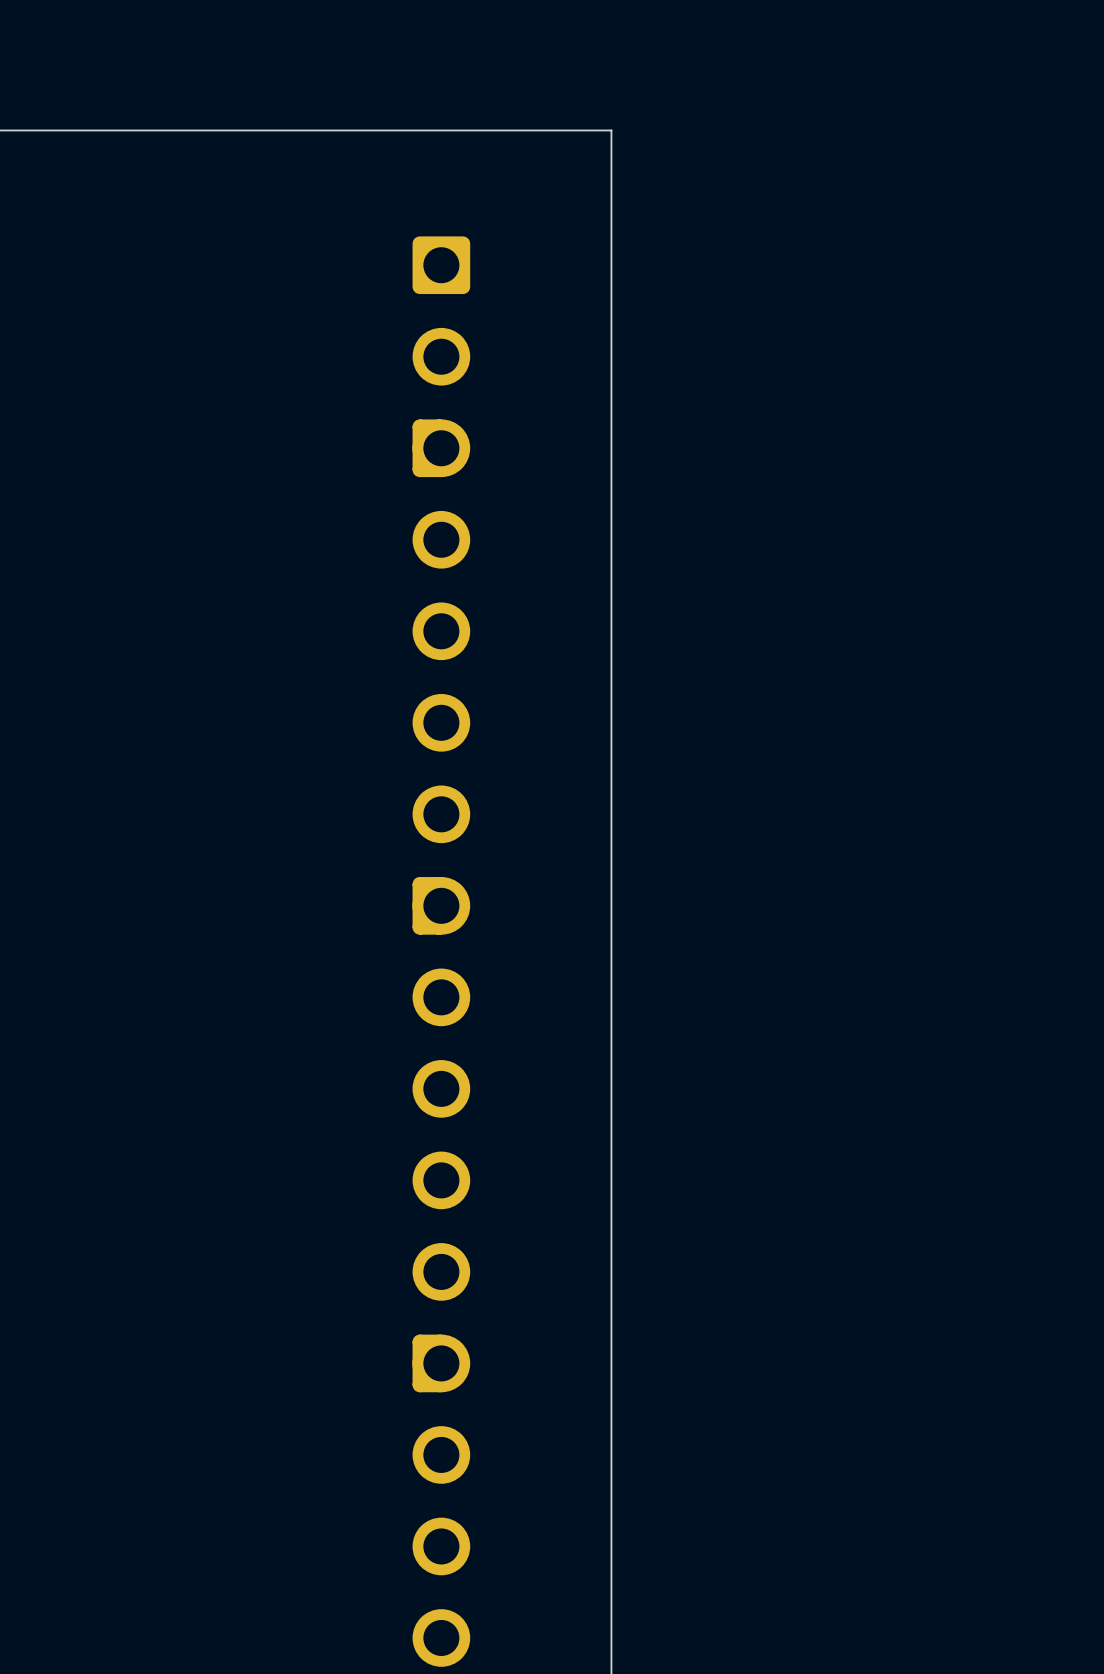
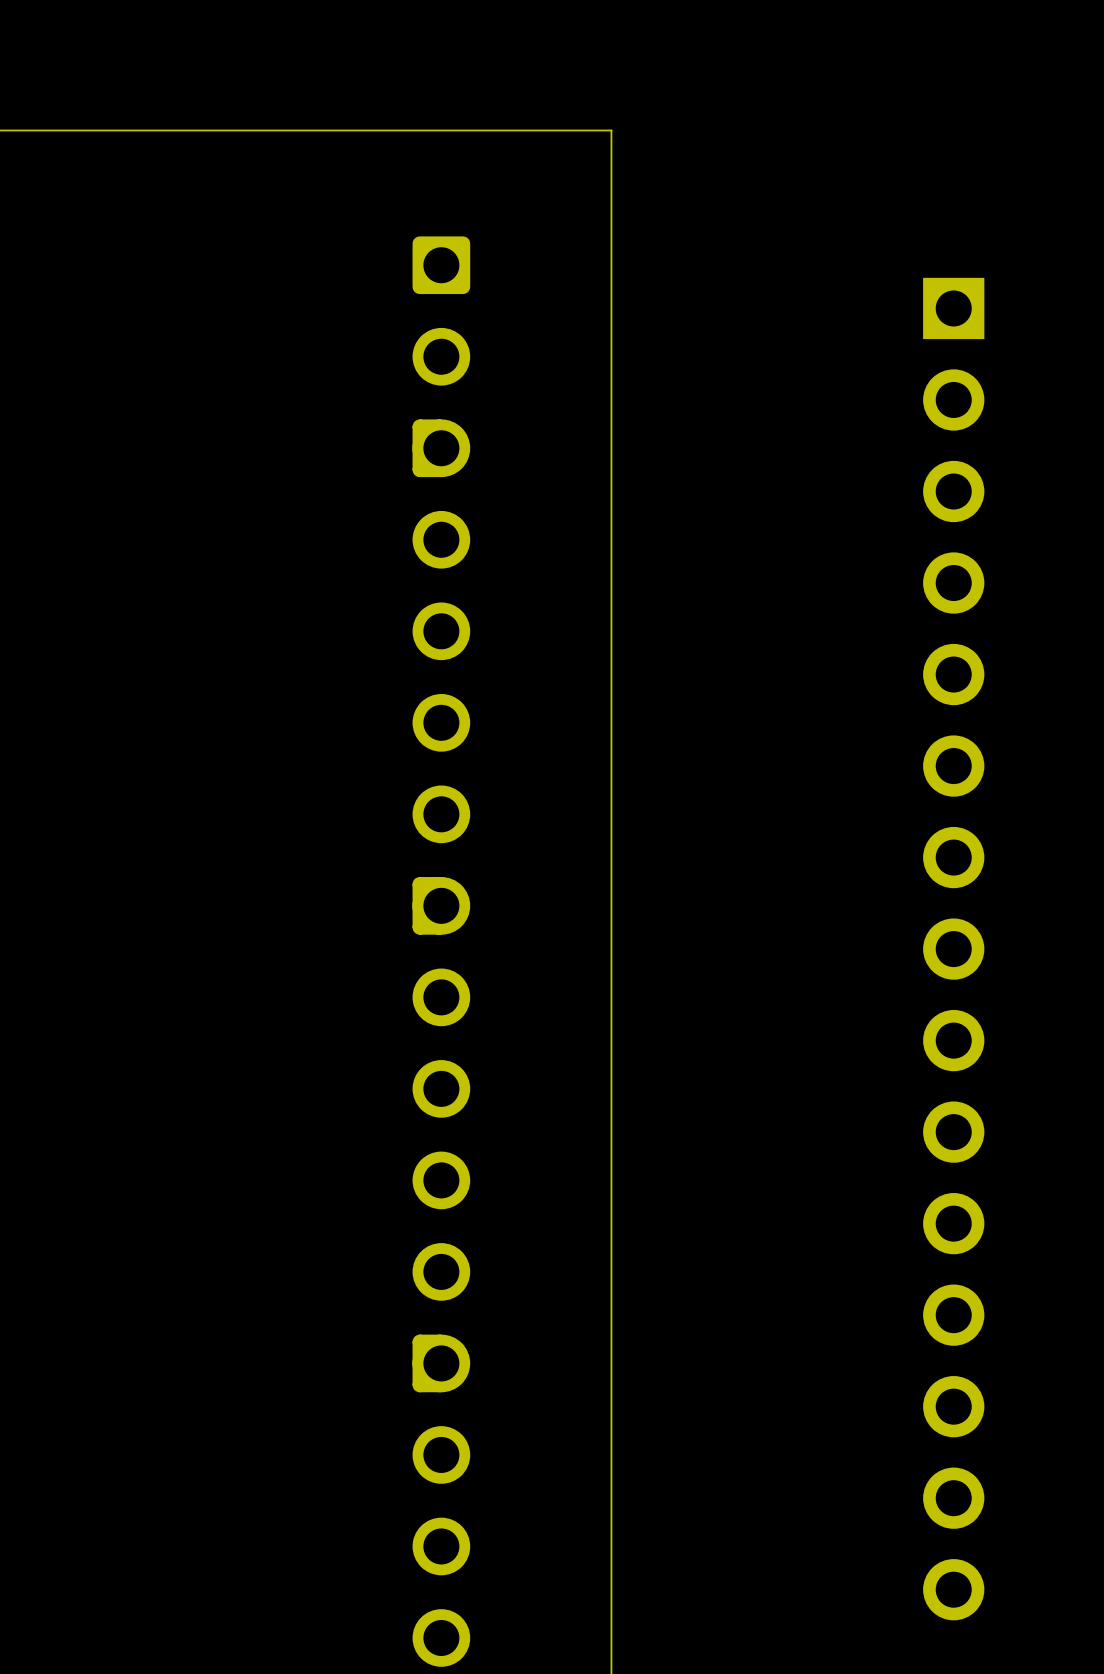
part: none -> (953, 949)

